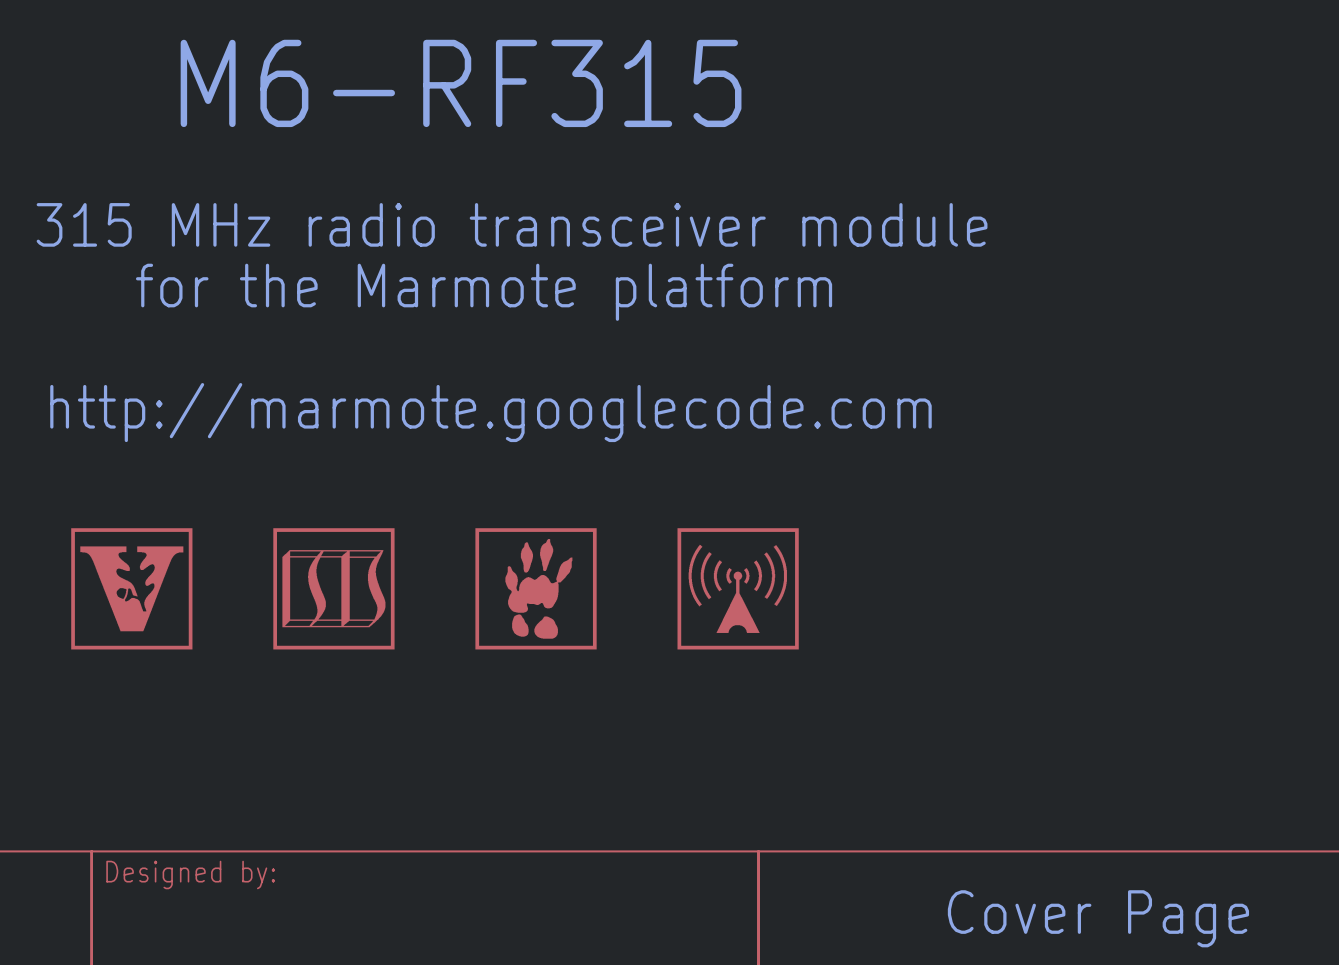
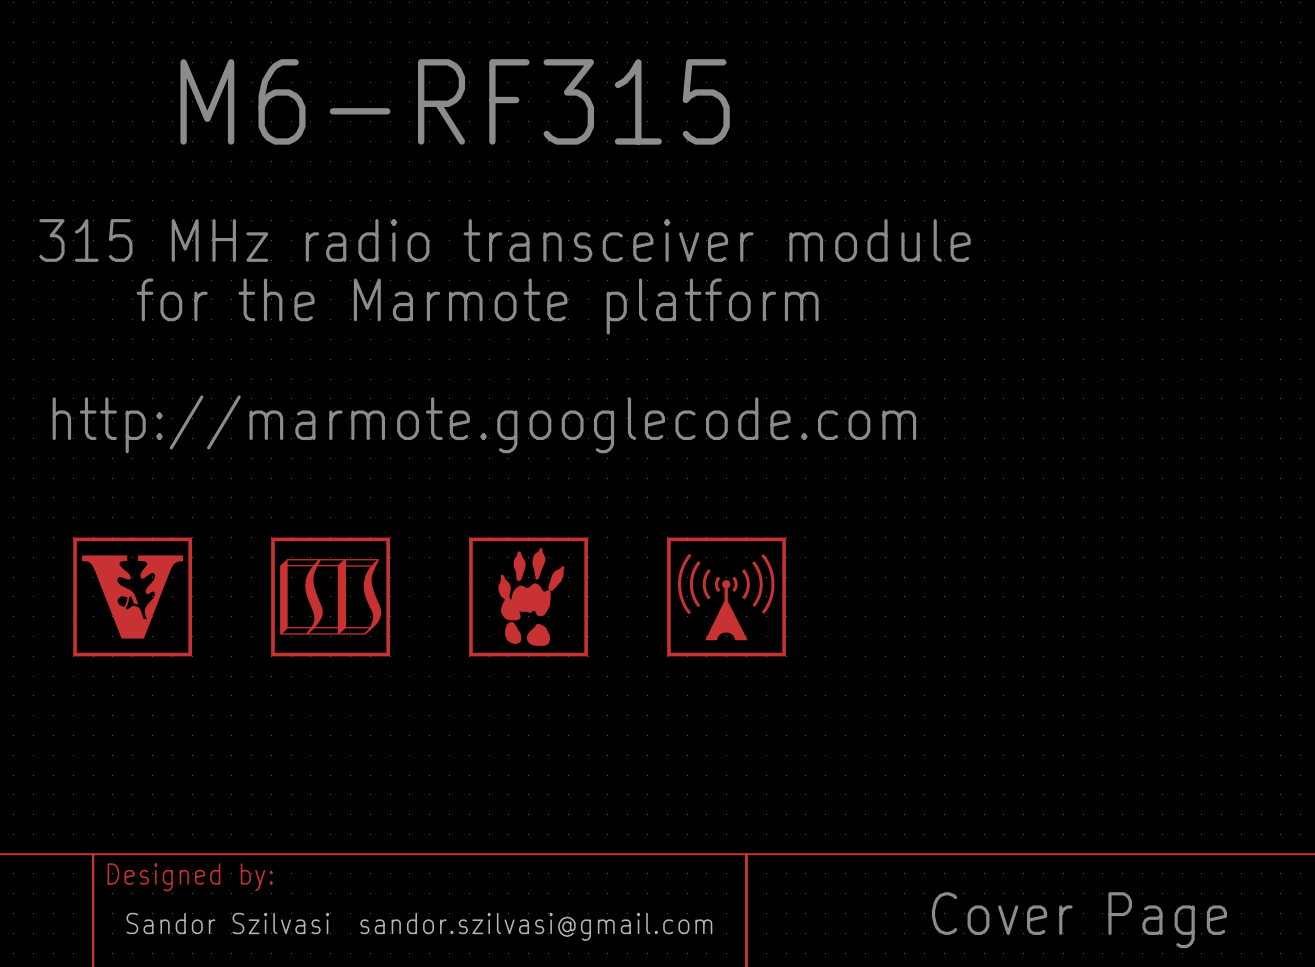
text: none -> Sandor Szilvasi (227, 923)
text: none -> sandor.szilvasi@gmail.com (536, 926)

